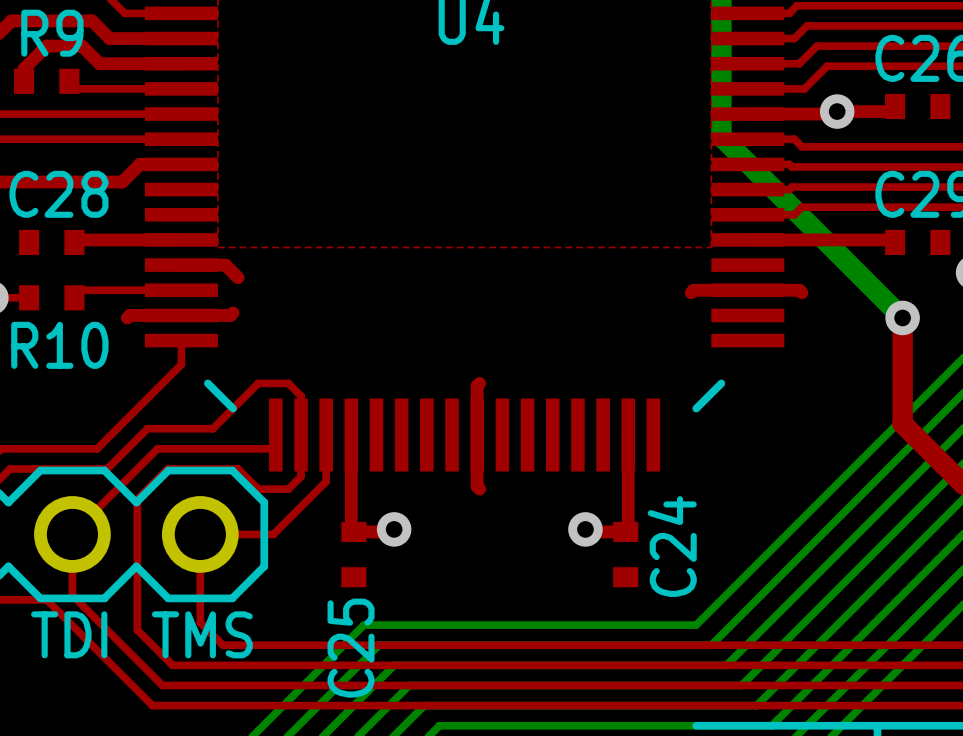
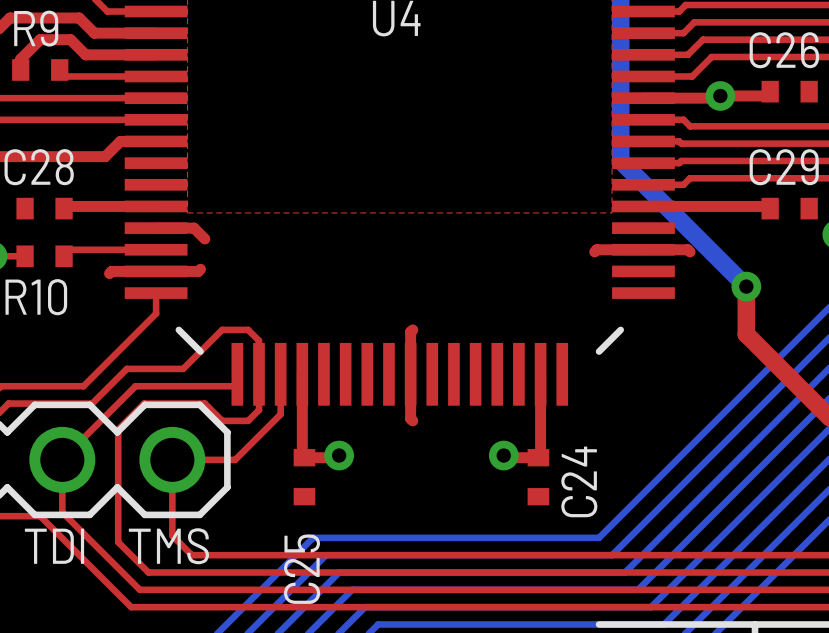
bottom track: (721, 136) (902, 317) -> (620, 117) (620, 160) (746, 286)
top track: (902, 317) (902, 423) -> (746, 286) (746, 334) (776, 364)
via position: (902, 317) -> (746, 286)

